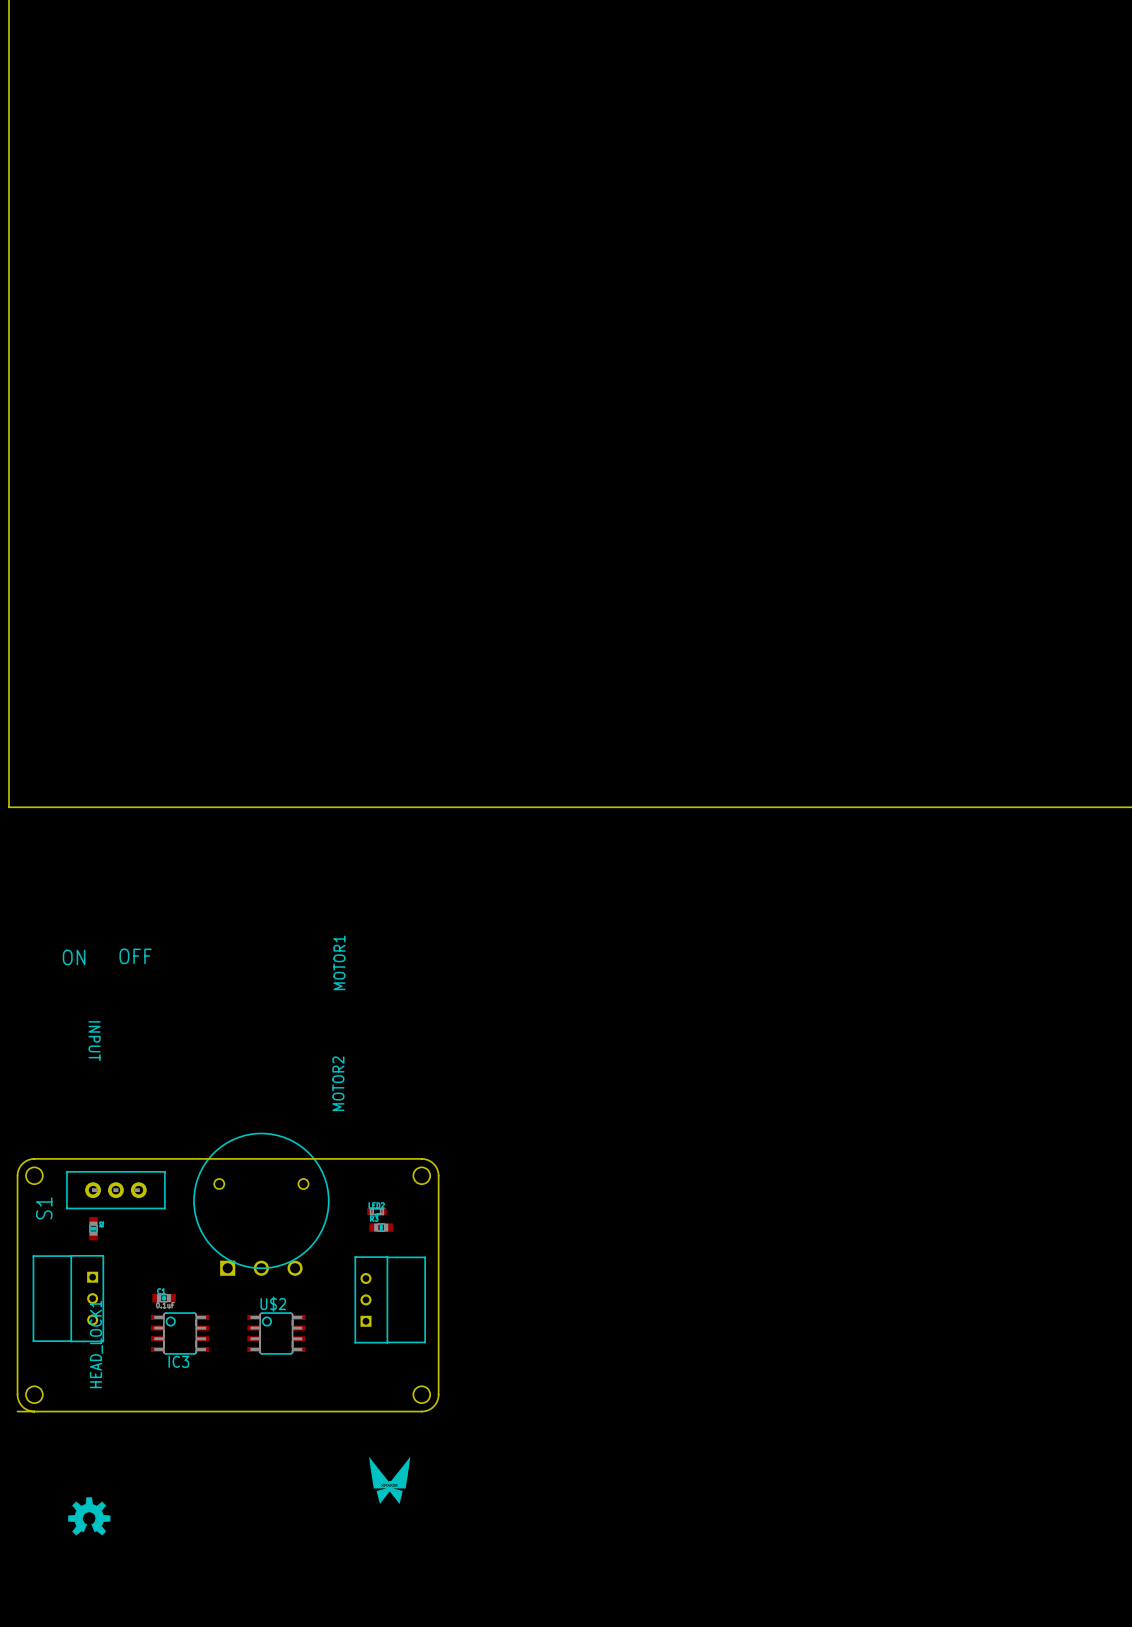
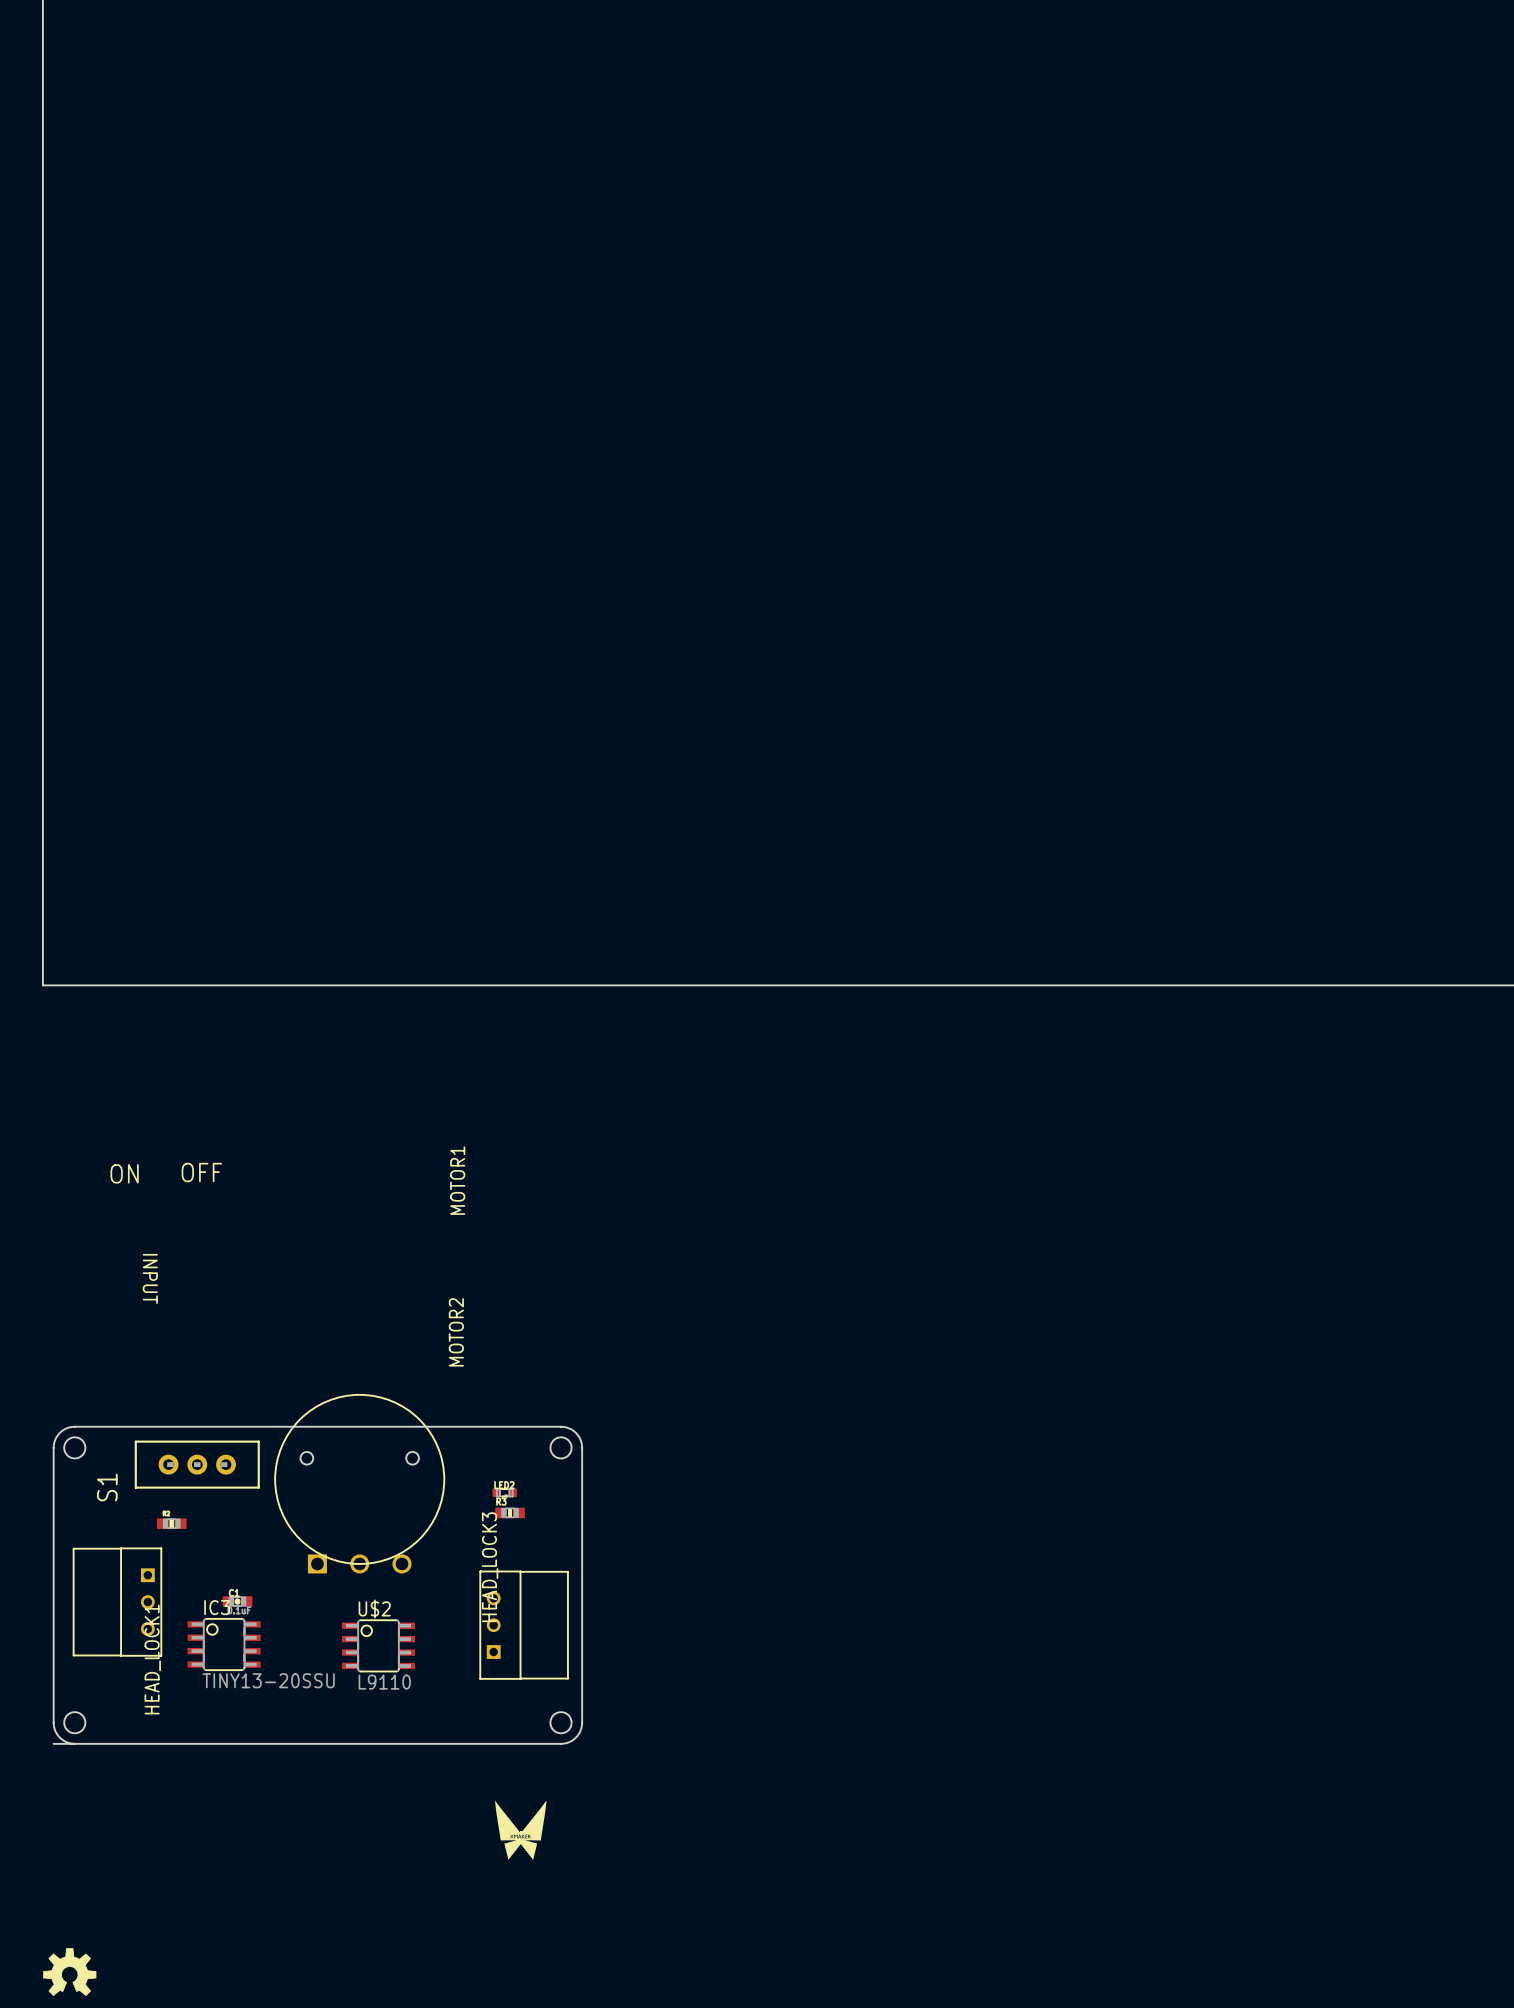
S1 position: (115, 1190) -> (197, 1464)
part rotation: 0° (93, 1228) -> 90° clockwise (171, 1523)
part position: (93, 1228) -> (171, 1523)
part: (390, 1299) -> none
HEAD_LOCK3: none -> (524, 1625)
IC3 position: (180, 1333) -> (224, 1644)
IC3 name position: IC3 (178, 1361) -> IC3 (217, 1607)
IC3 value: none -> TINY13-20SSU (268, 1680)
U$2 value: none -> L9110 (384, 1682)
drawing position: (89, 1516) -> (69, 1972)

